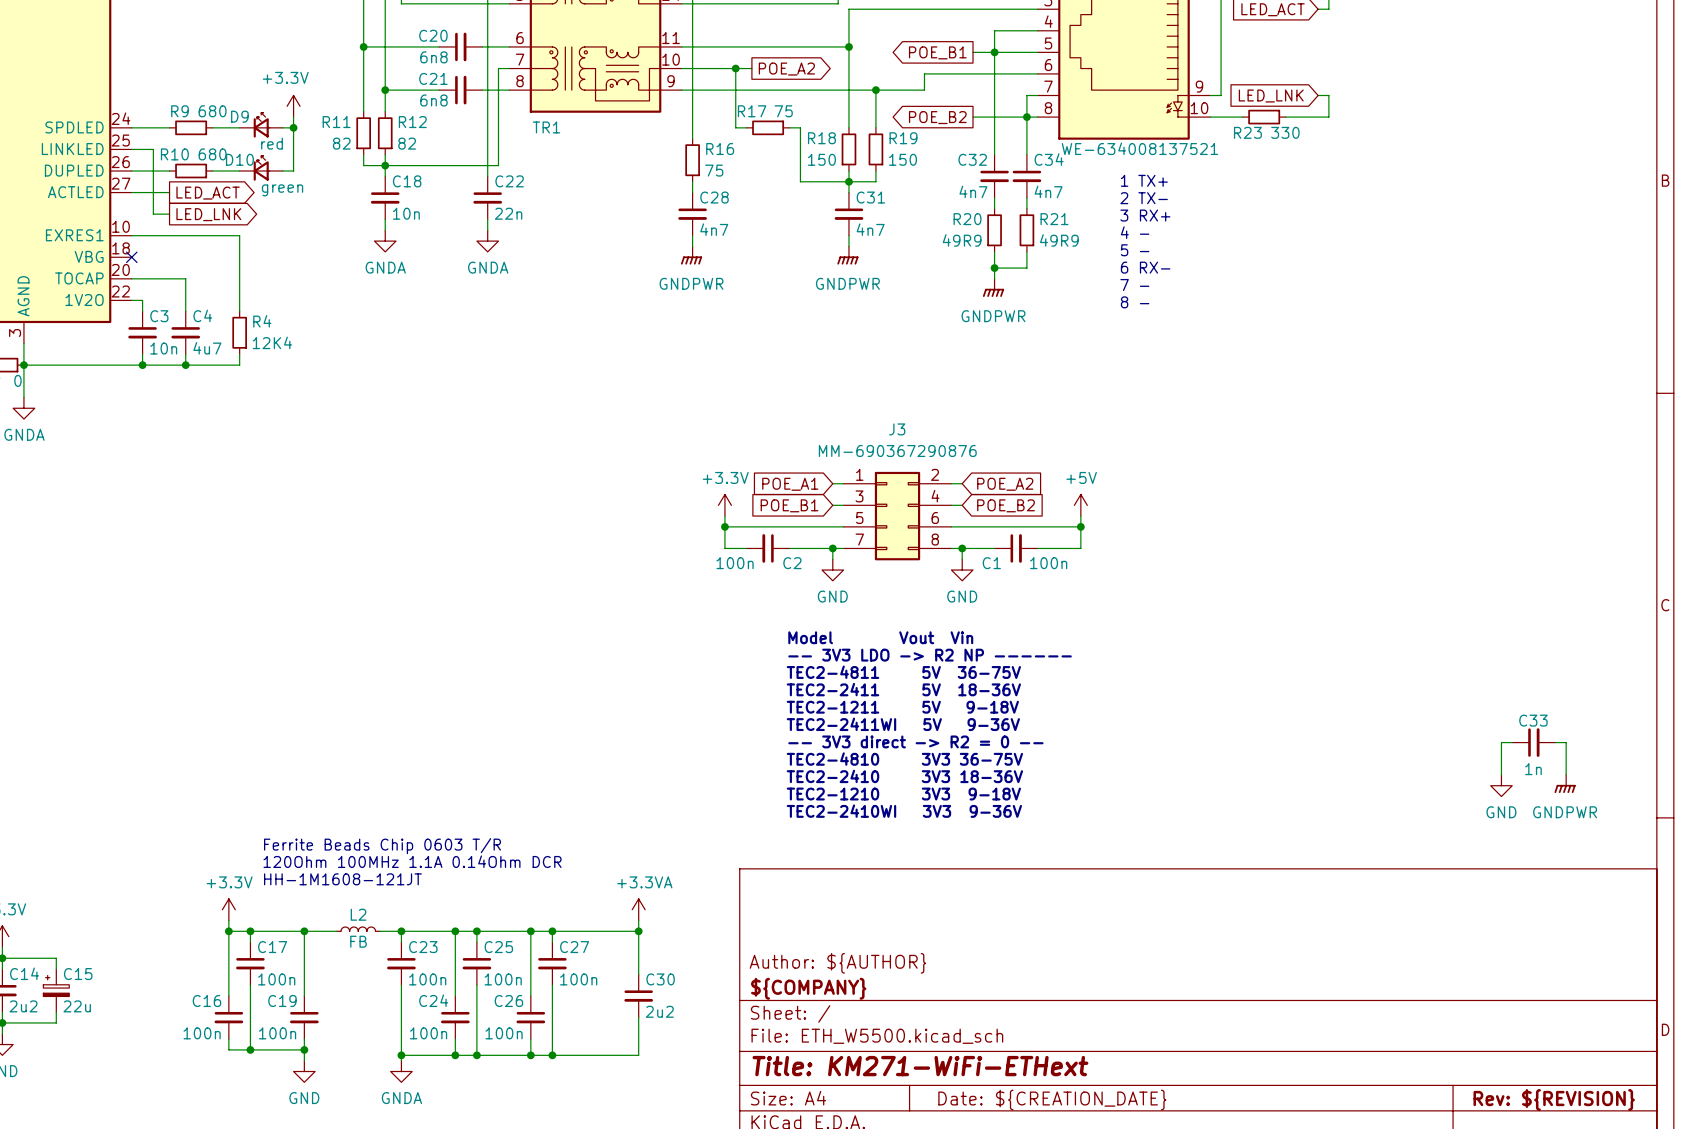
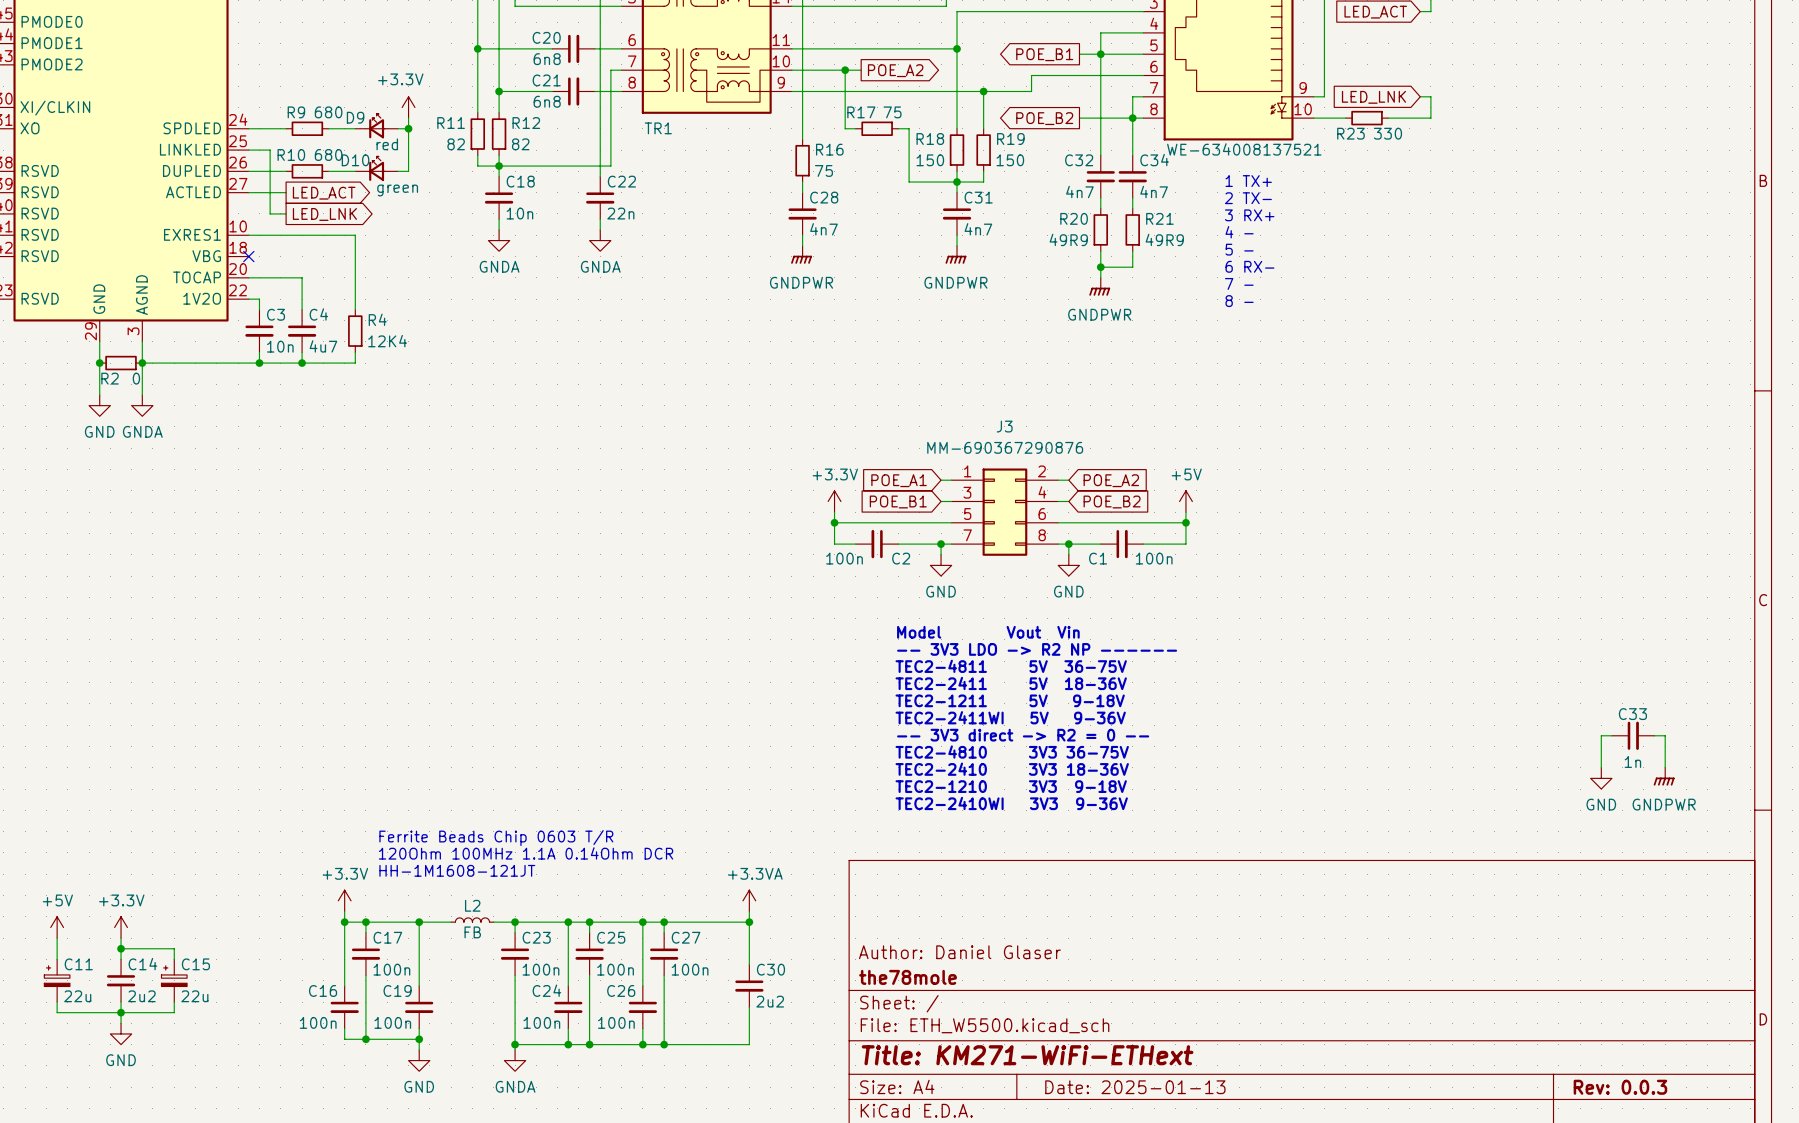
title block: Author: ${AUTHOR} (837, 963) -> Author: Daniel Glaser (959, 952)
title block: ${COMPANY} (808, 988) -> the78mole (907, 977)
title block: Date: ${CREATION_DATE} (1052, 1100) -> Date: 2025-01-13 (1135, 1087)
title block: Rev: ${REVISION} (1554, 1100) -> Rev: 0.0.3 (1620, 1087)

